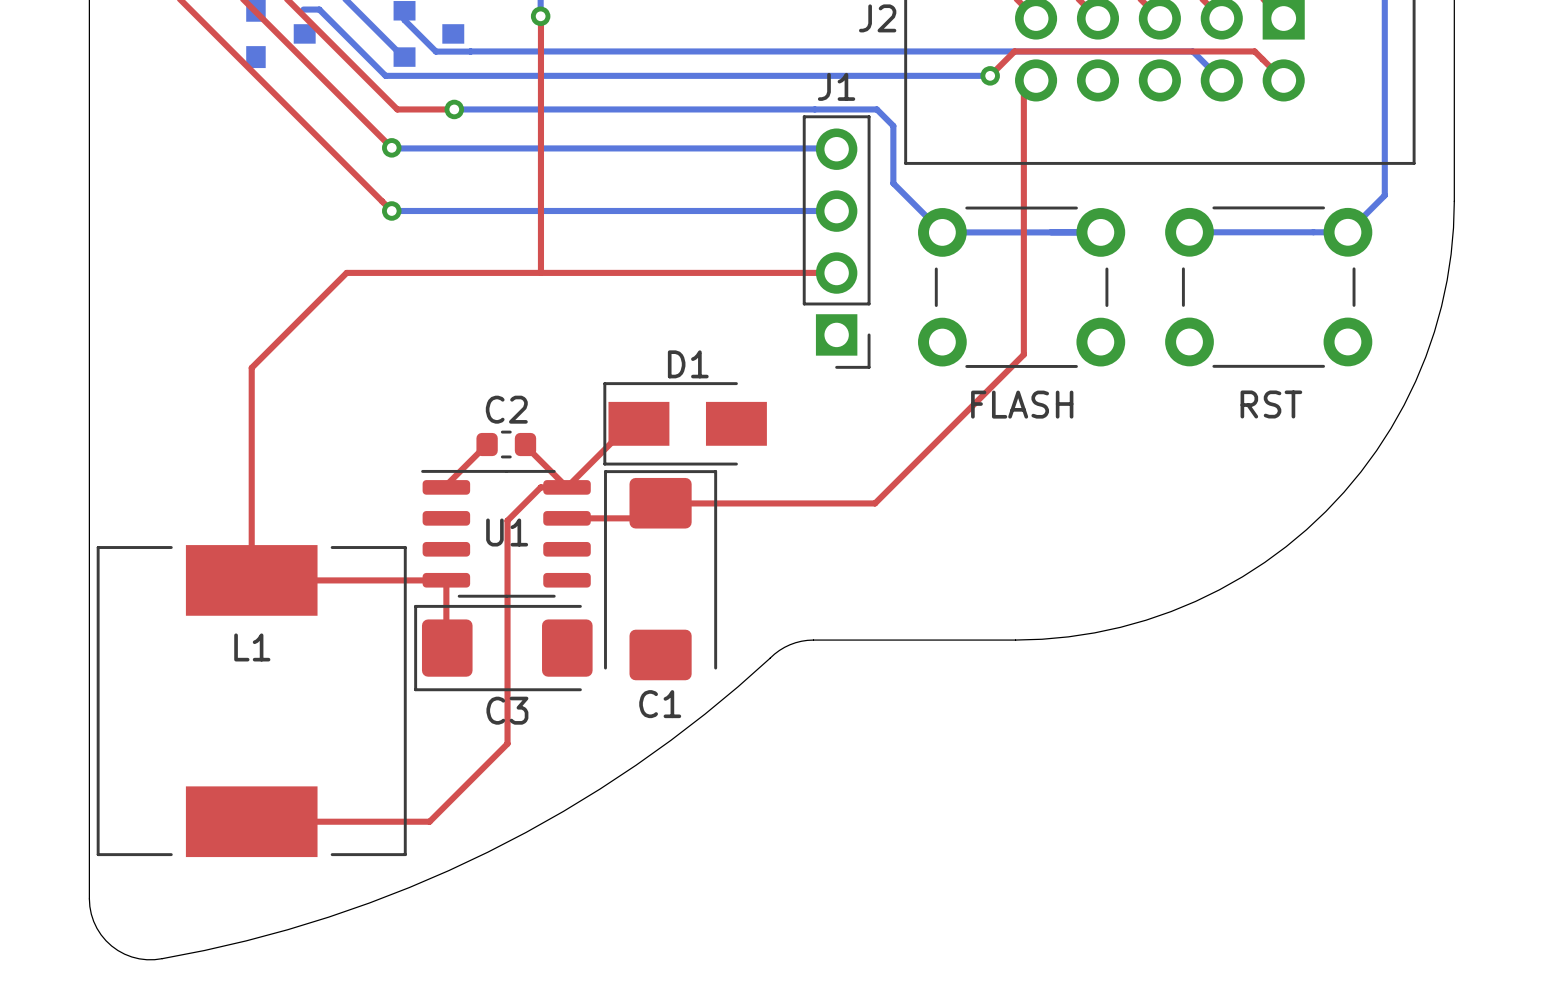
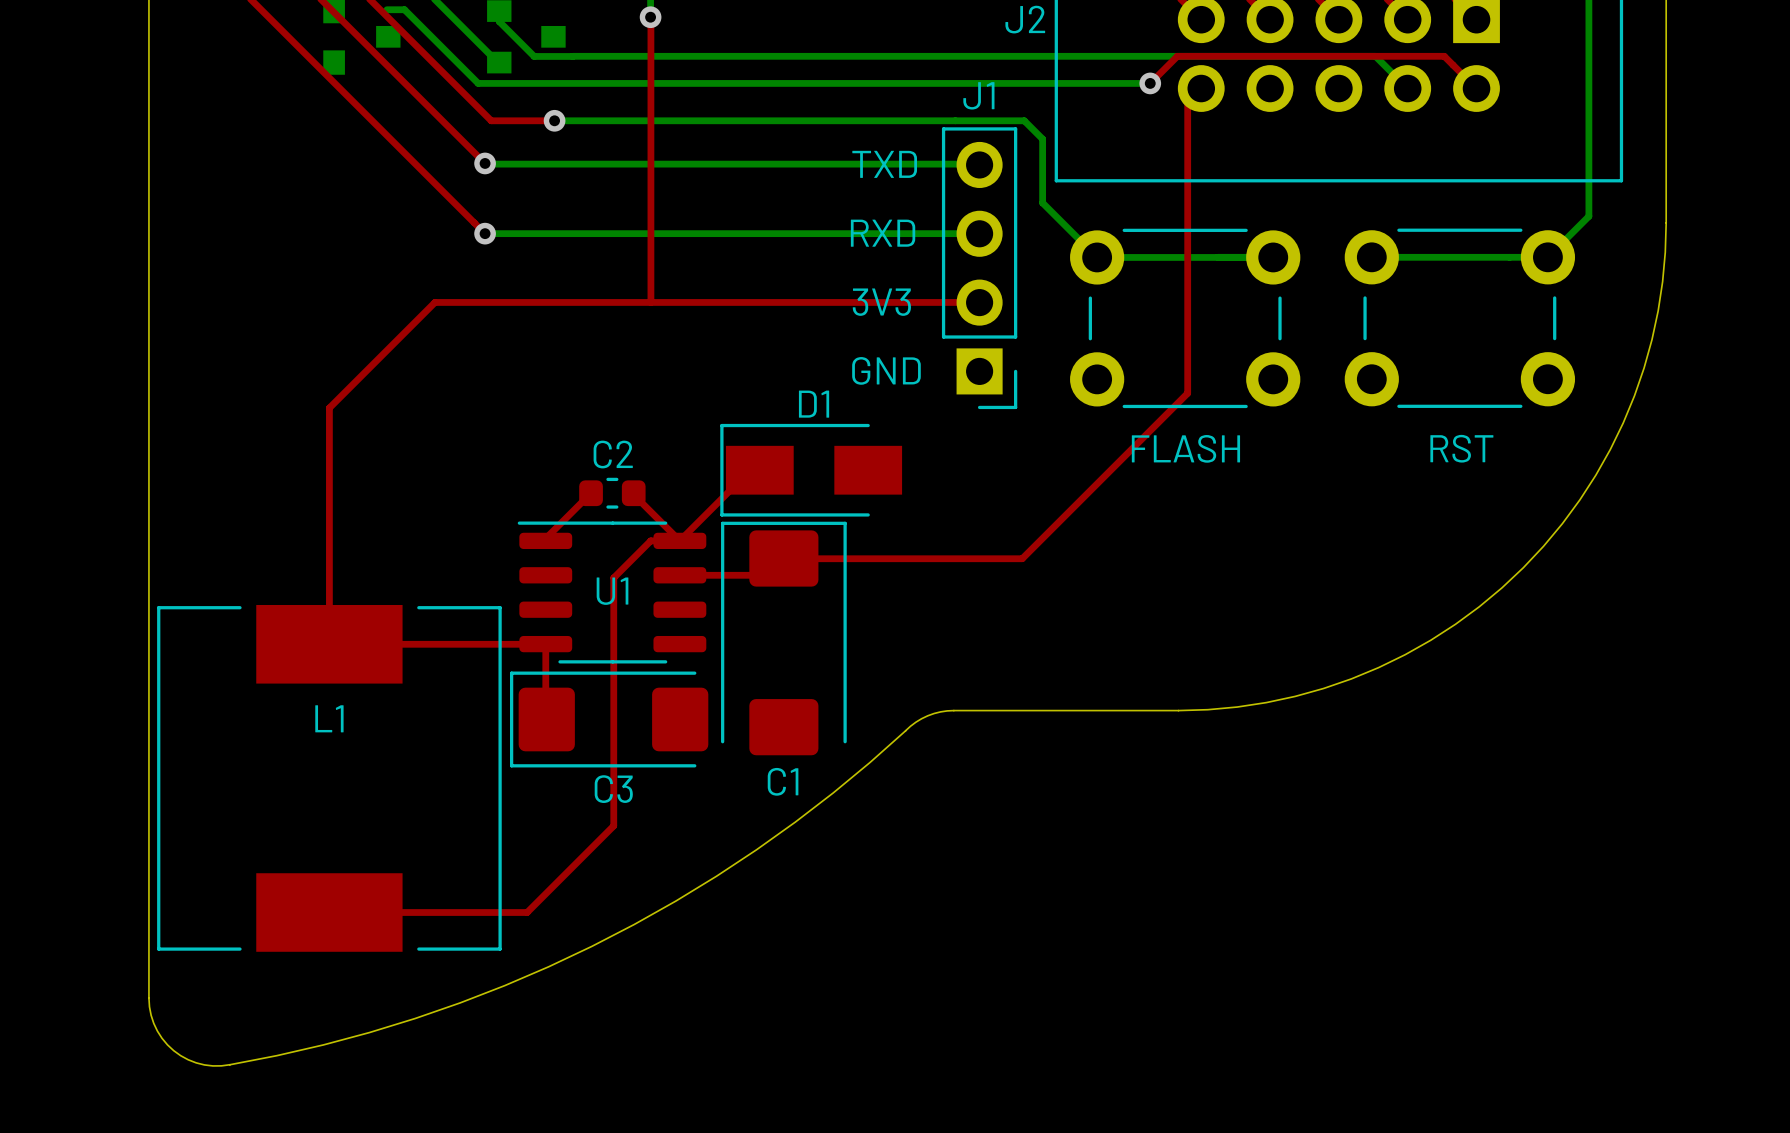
text: none -> TXD (884, 164)
text: none -> RXD (883, 233)
text: none -> 3V3 (881, 302)
text: none -> GND (886, 370)

